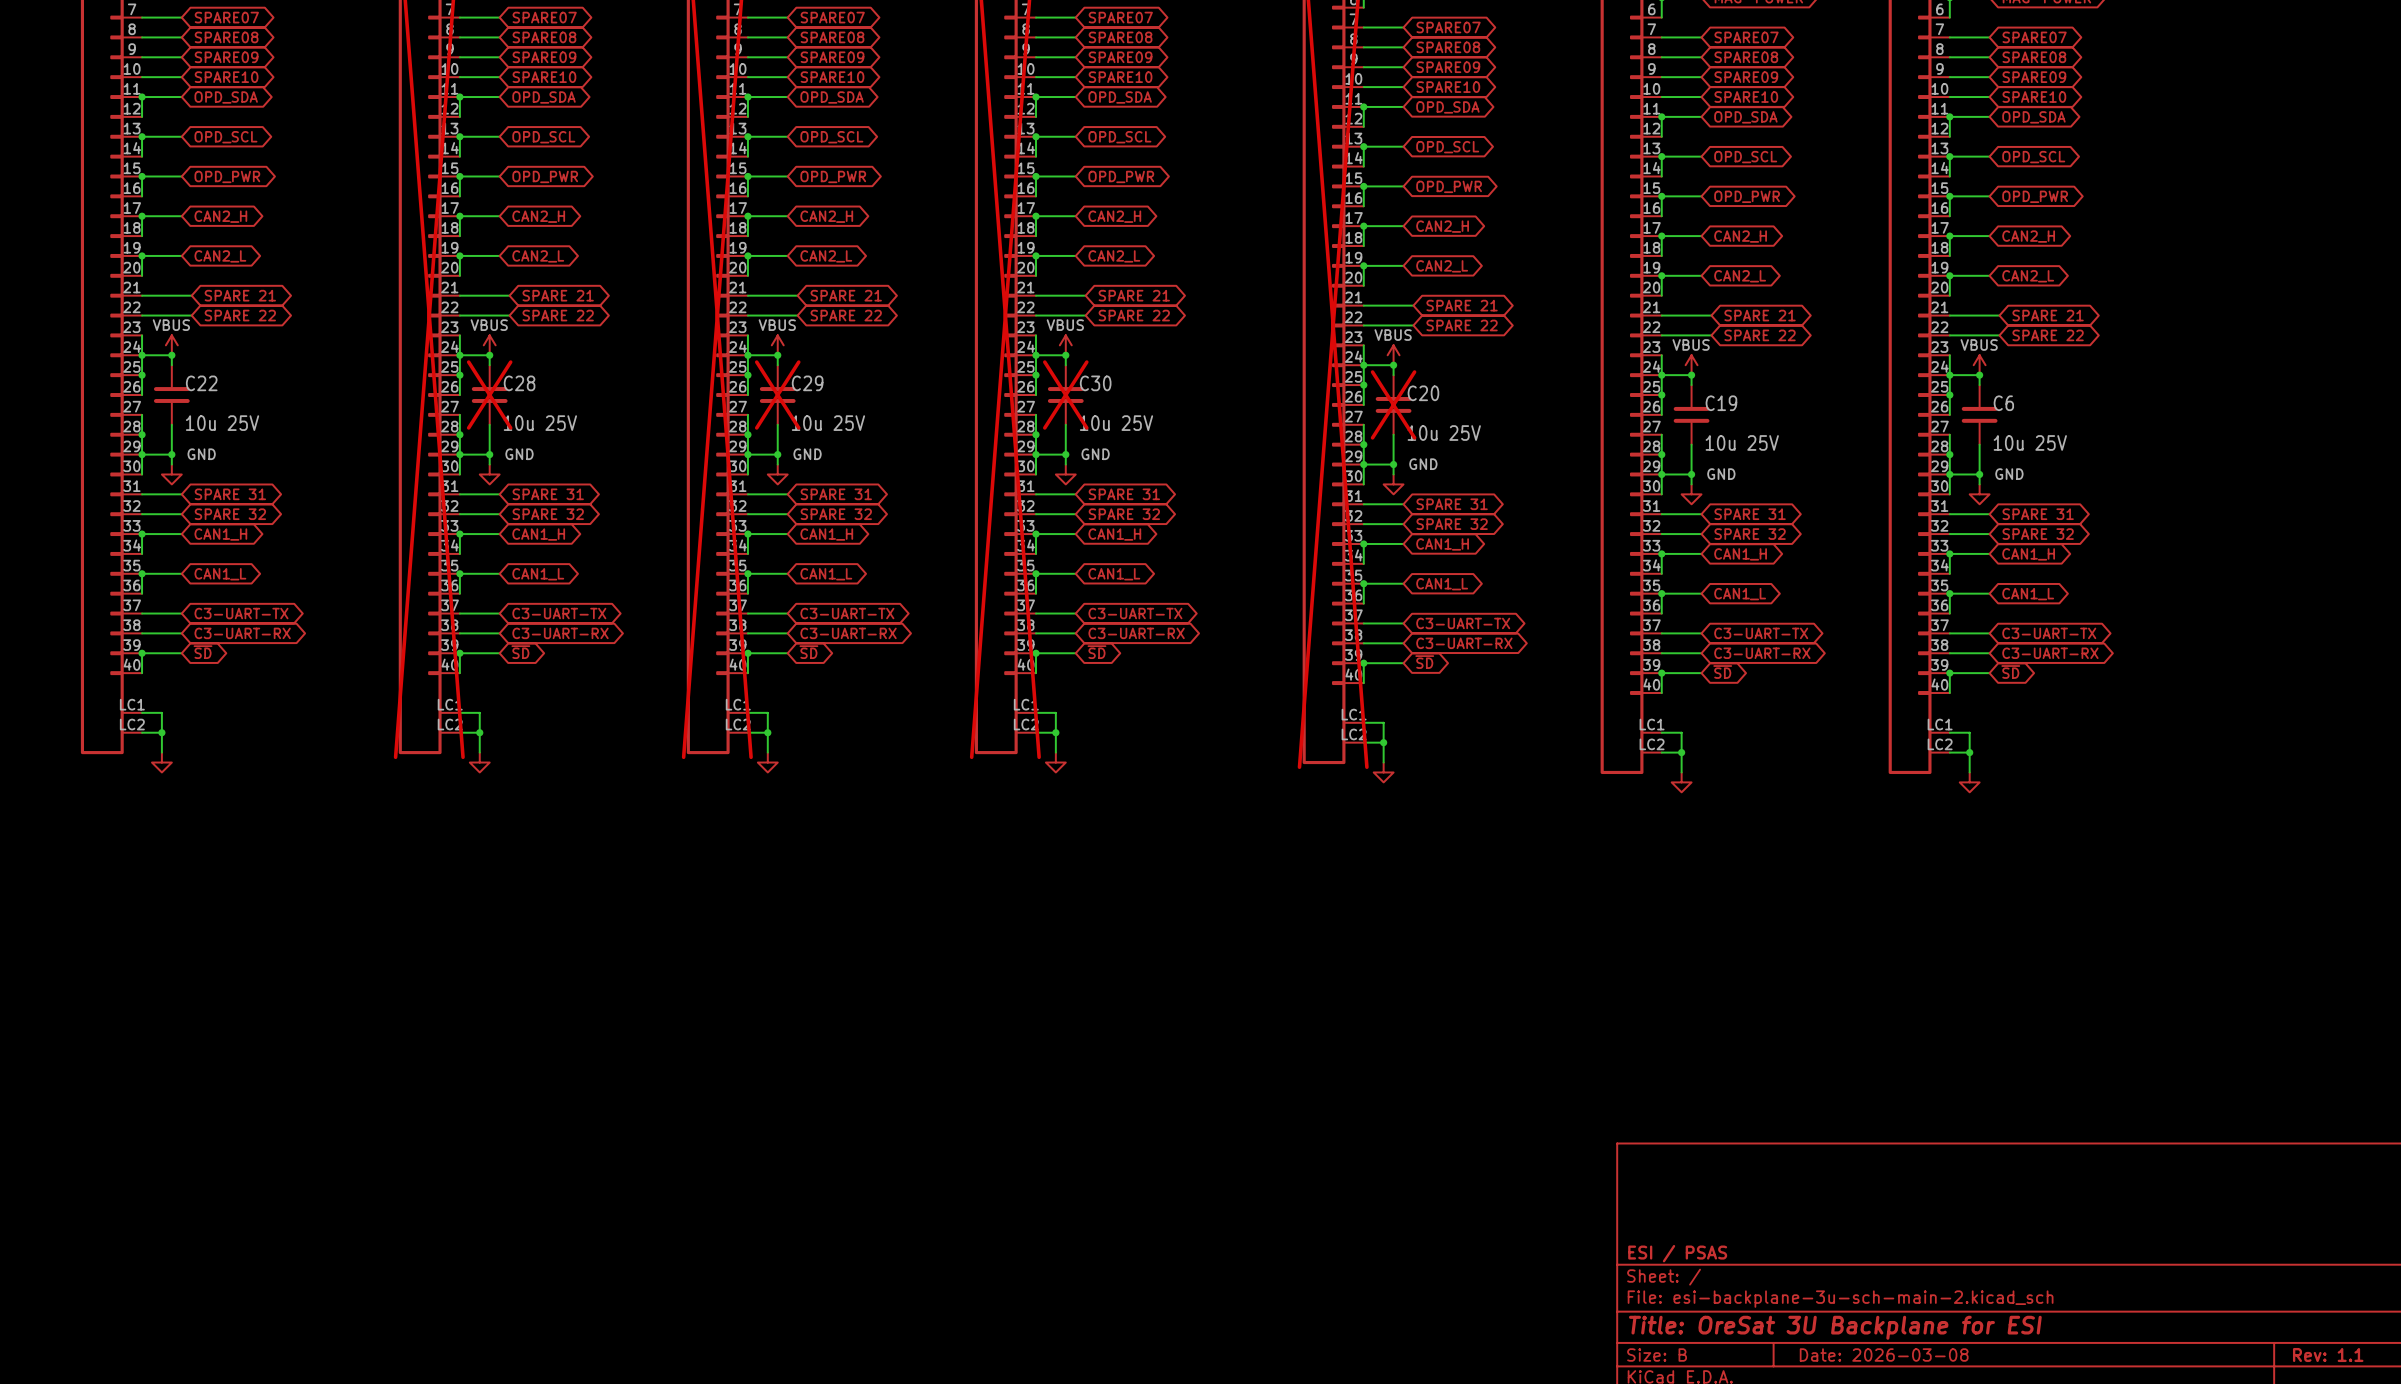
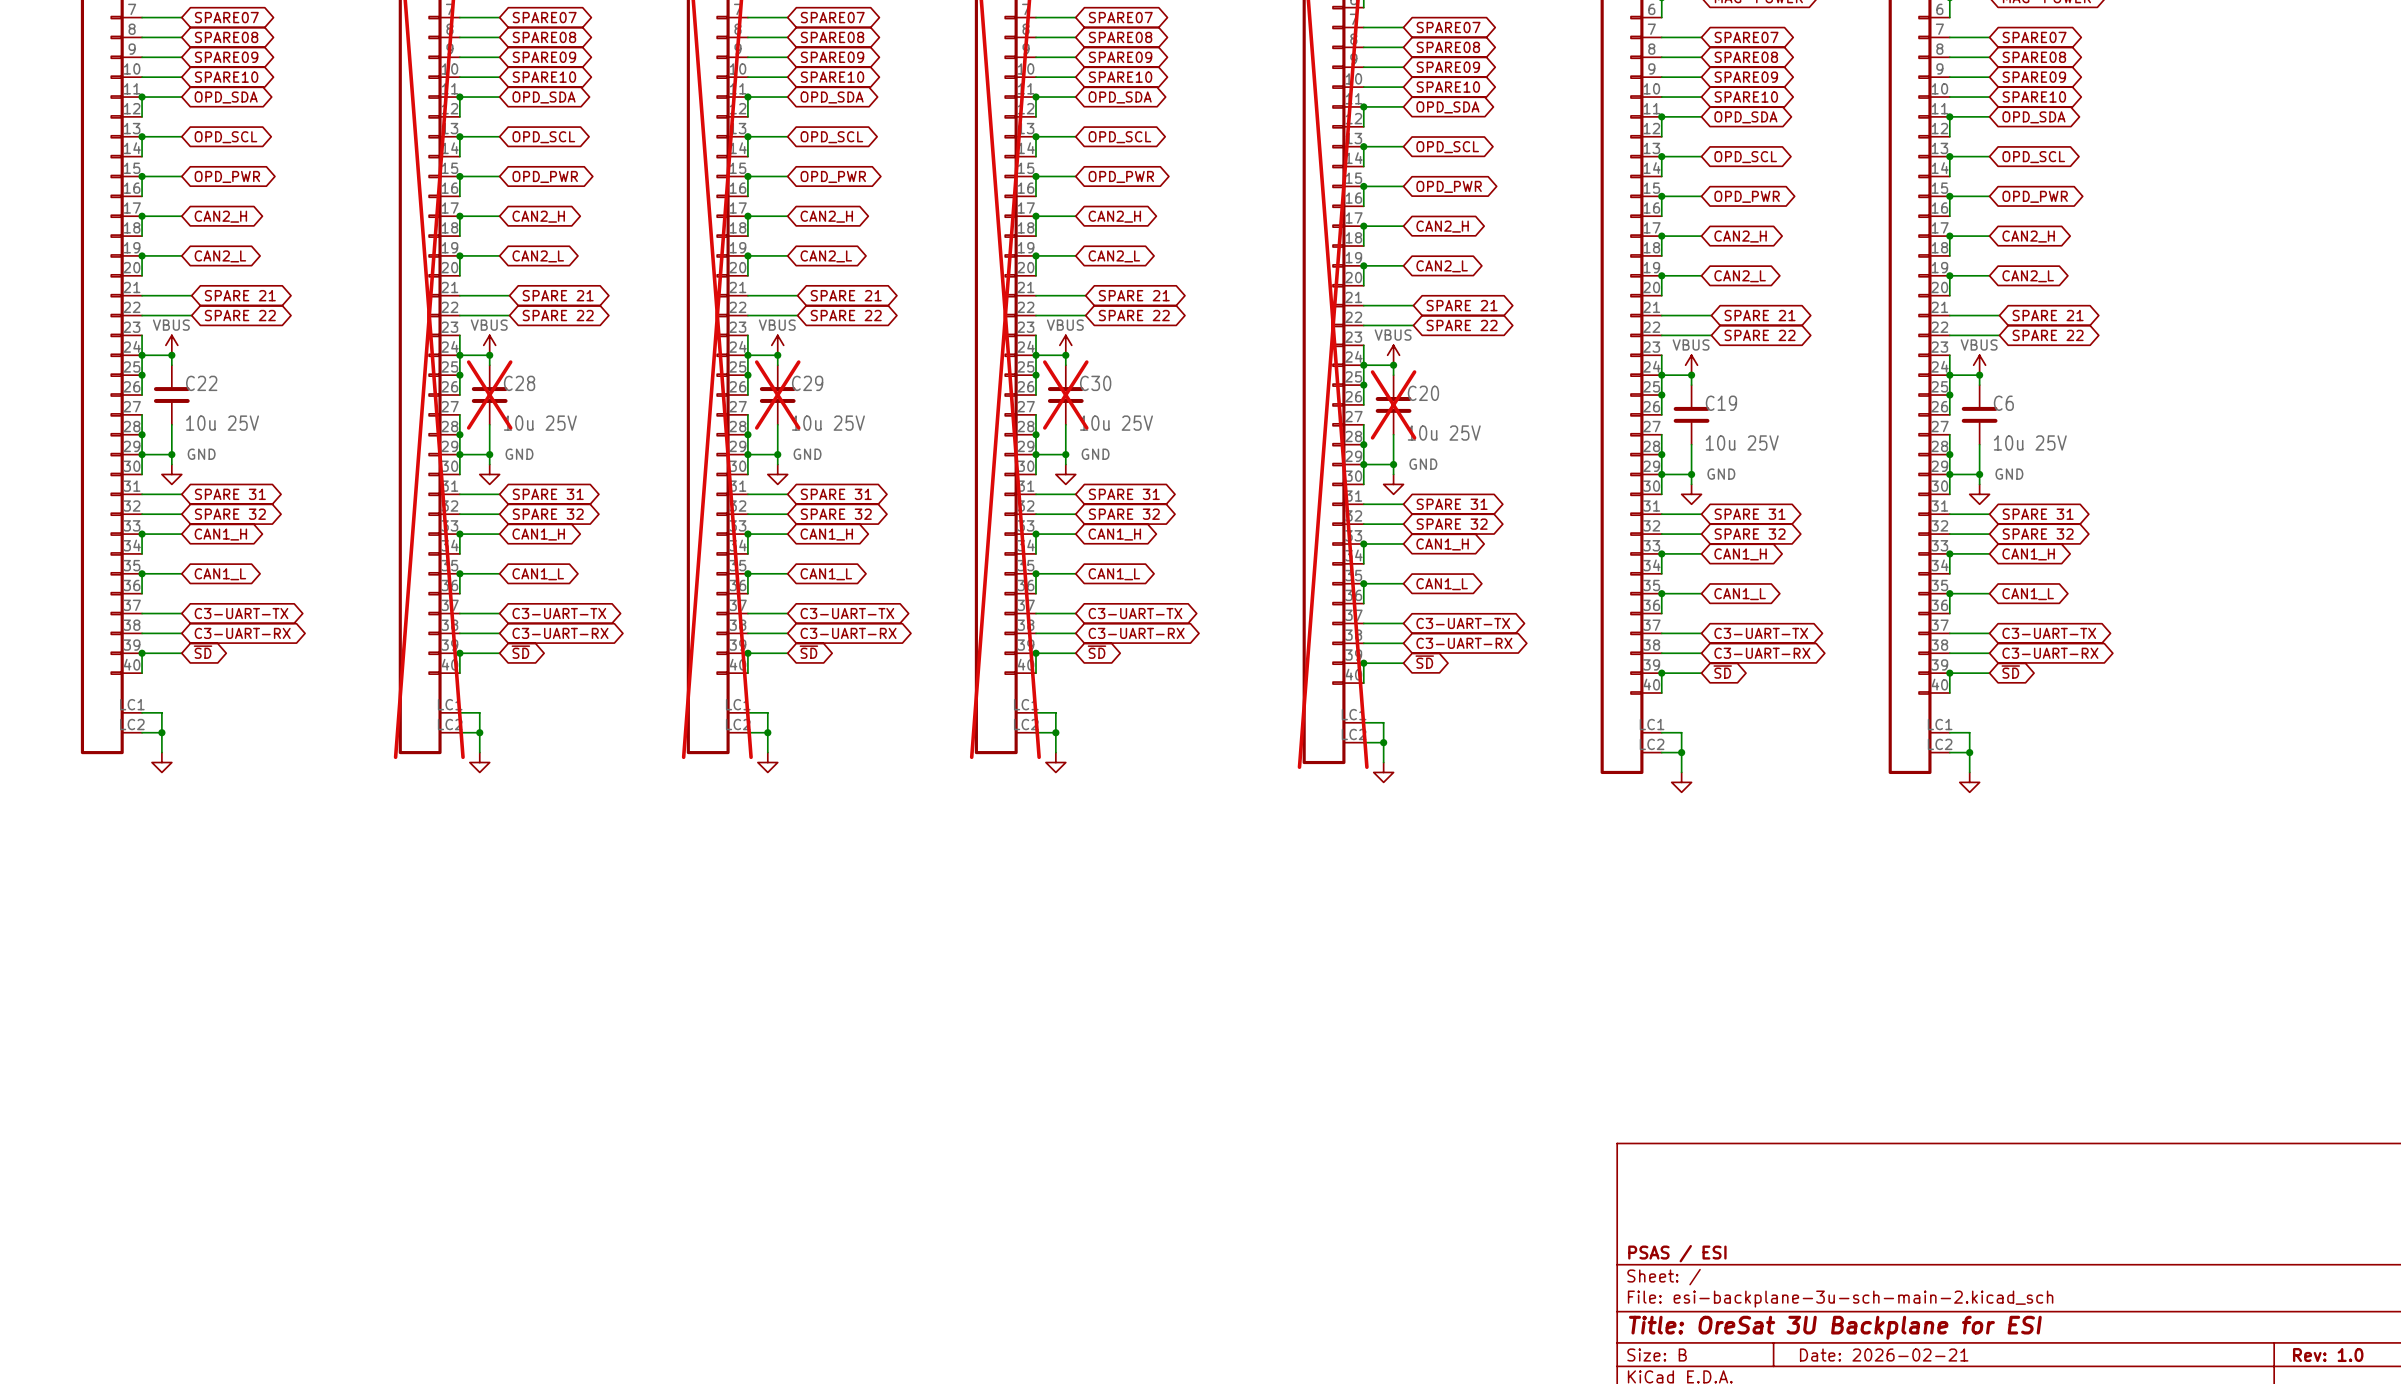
title block: ESI / PSAS (1677, 1253) -> PSAS / ESI (1677, 1253)
title block: Date: 2026-03-08 (1884, 1355) -> Date: 2026-02-21 (1884, 1355)
title block: Rev: 1.1 (2328, 1355) -> Rev: 1.0 (2328, 1355)

